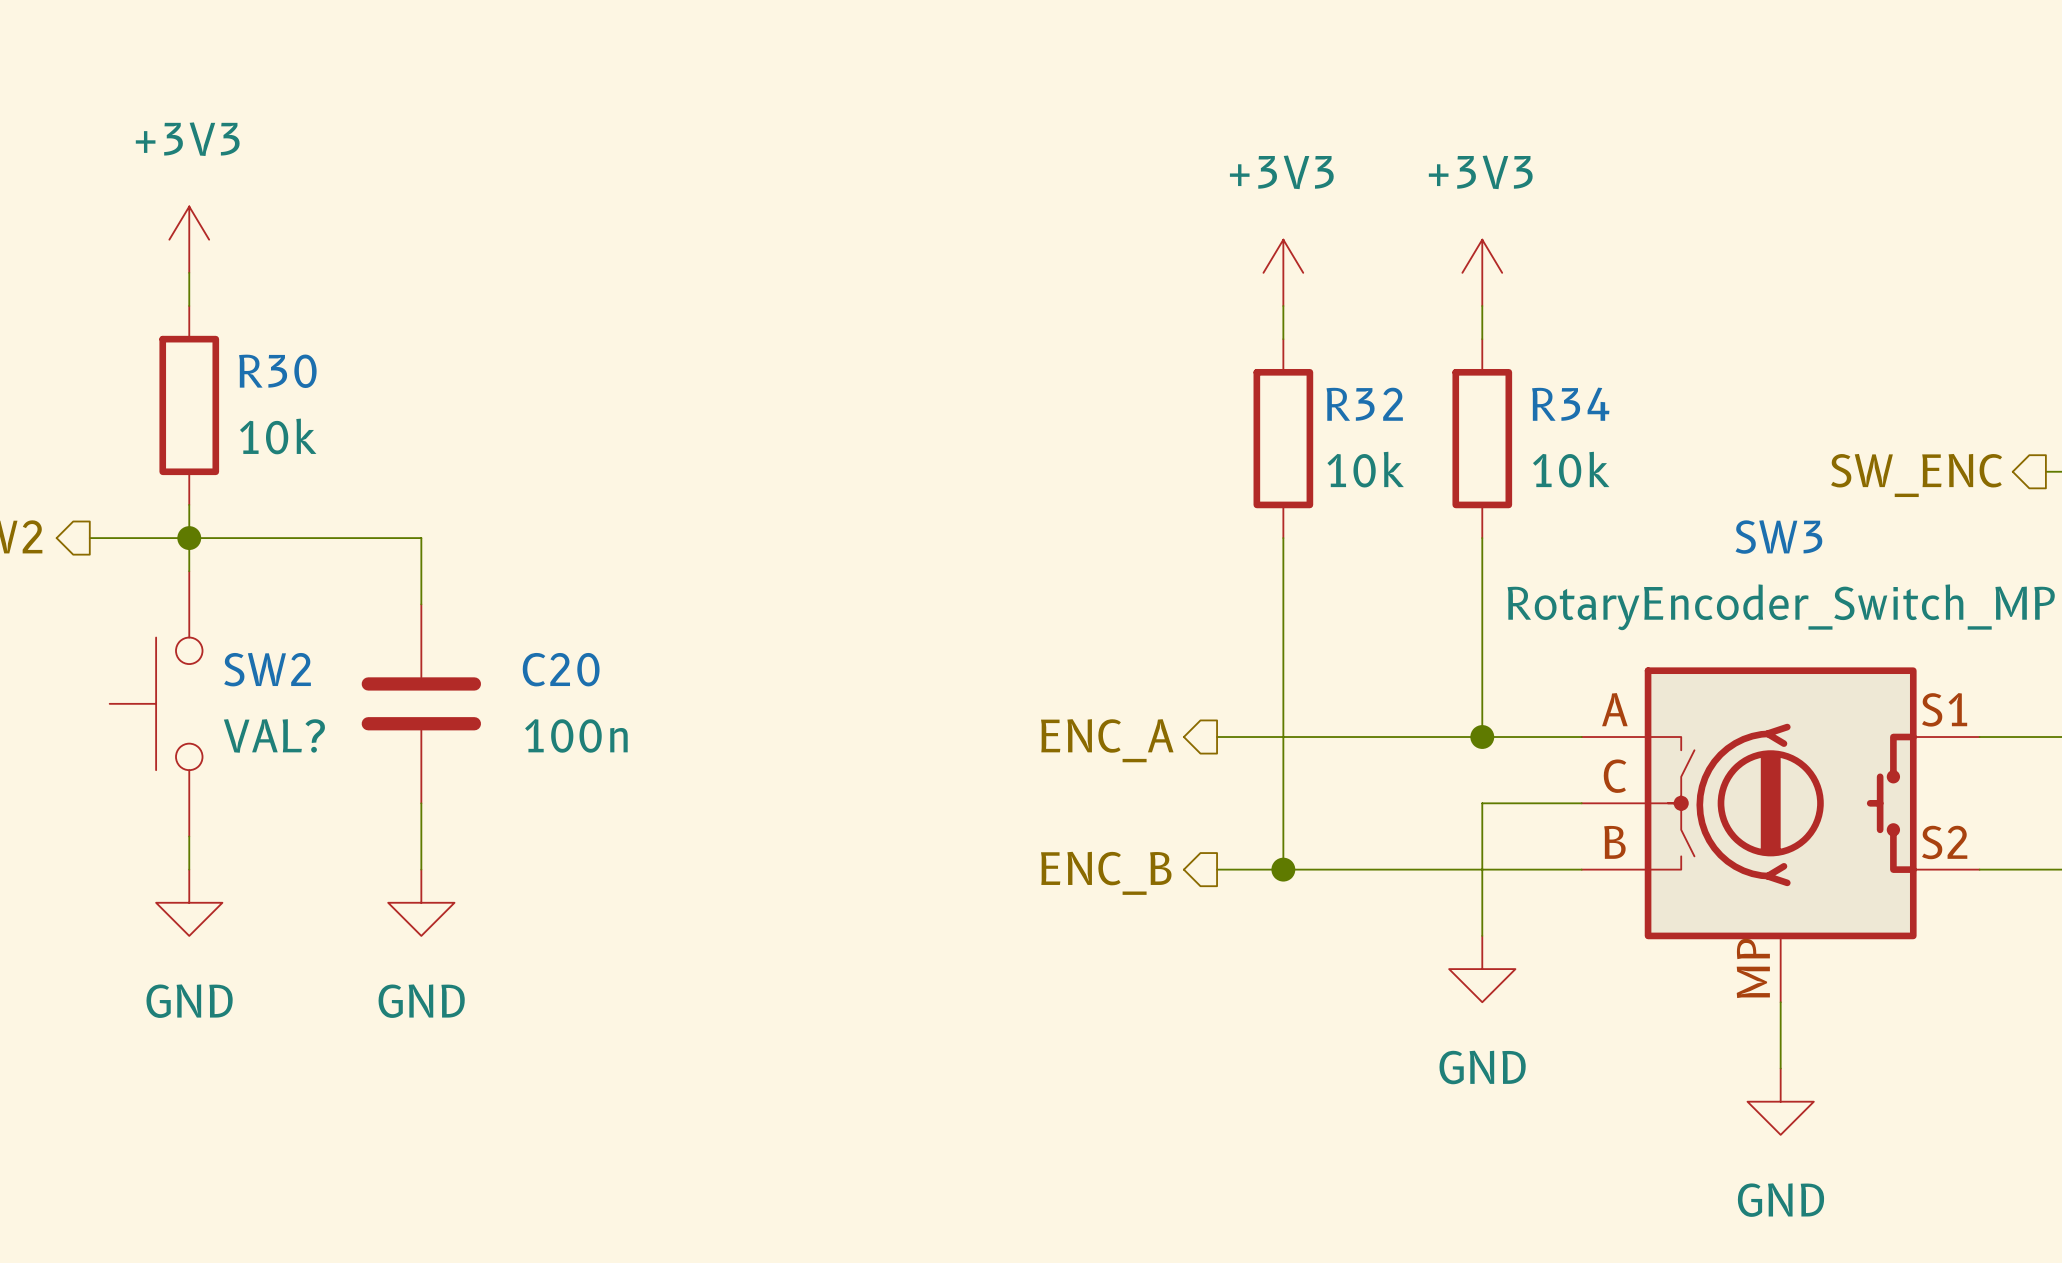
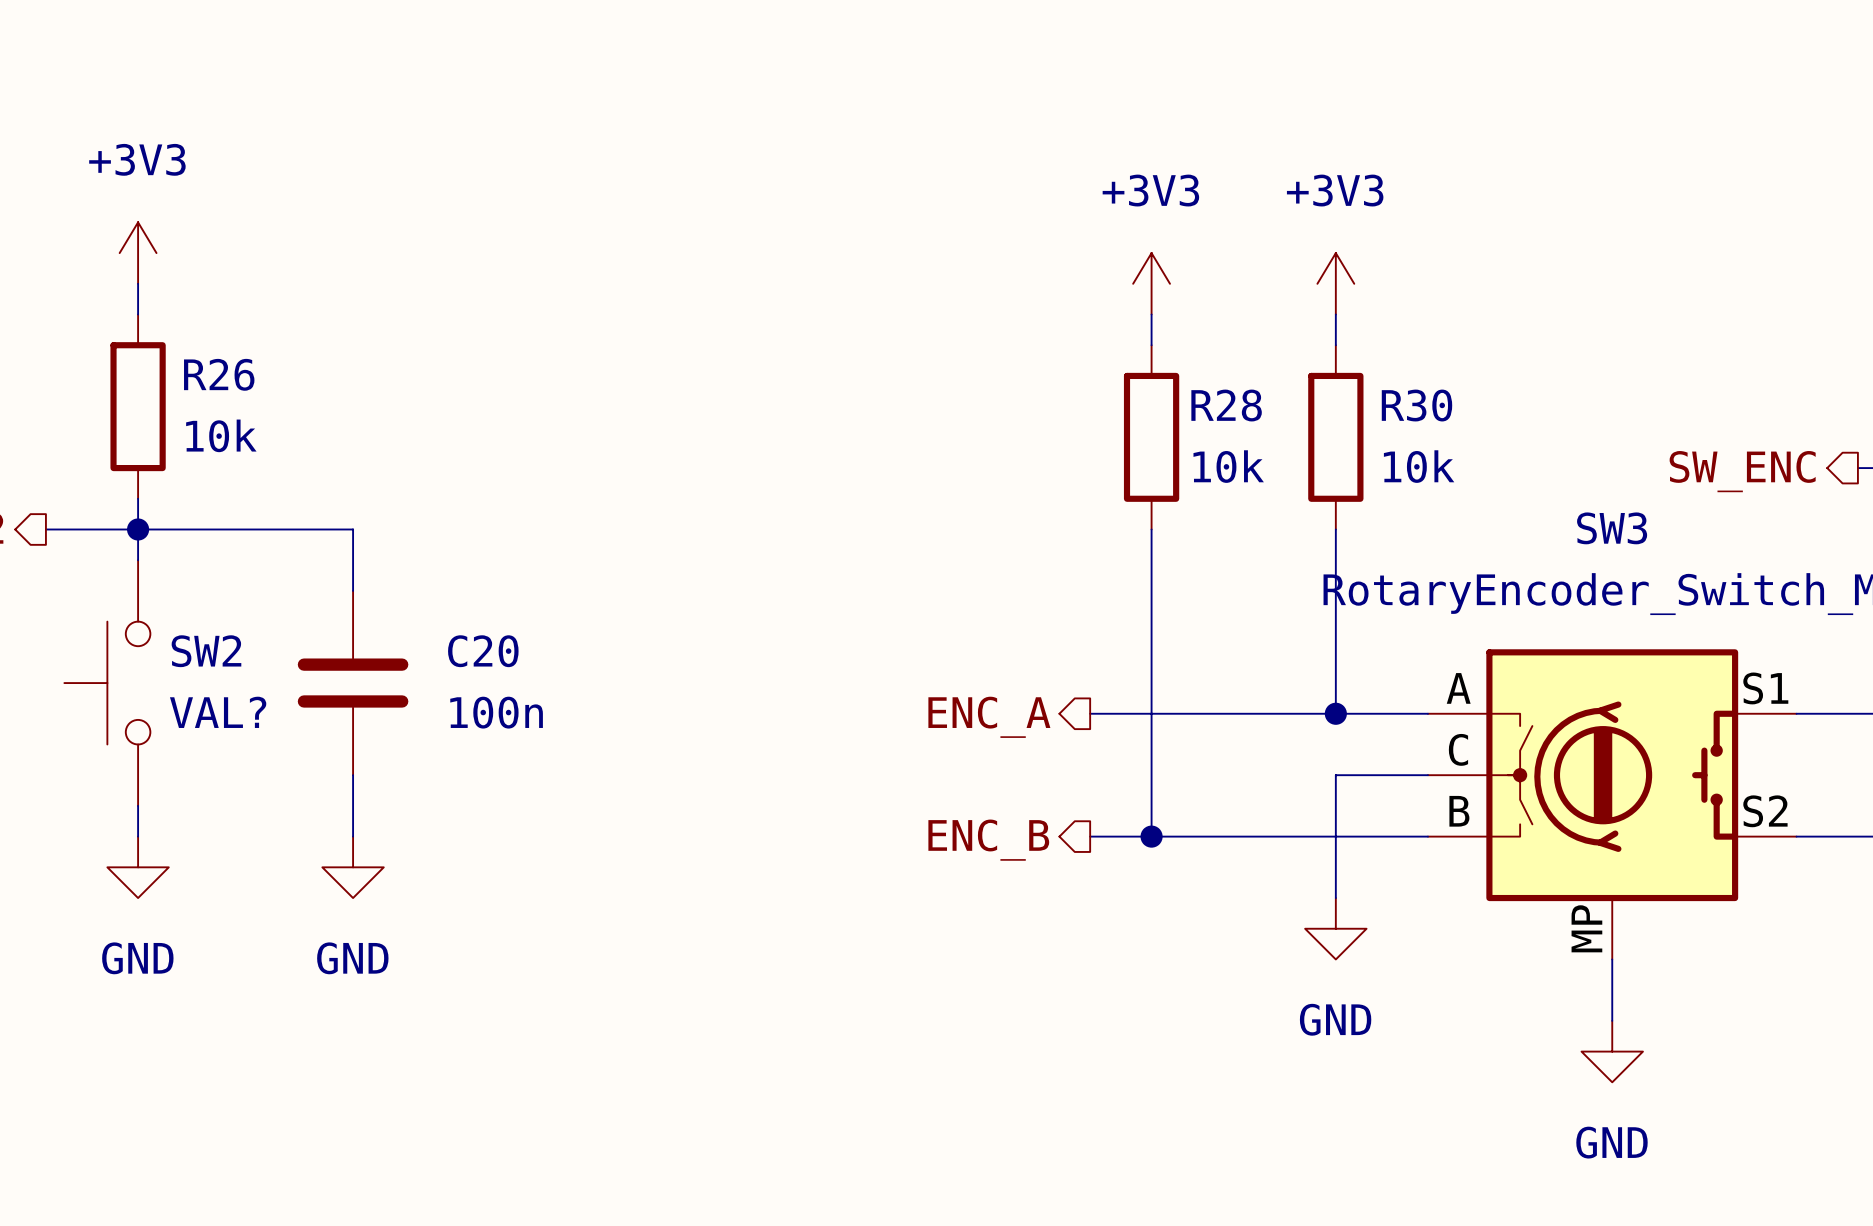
R30 name: R30 (277, 371) -> R26 (219, 374)
R32 name: R32 (1364, 404) -> R28 (1226, 405)
R34 name: R34 (1570, 404) -> R30 (1416, 405)

